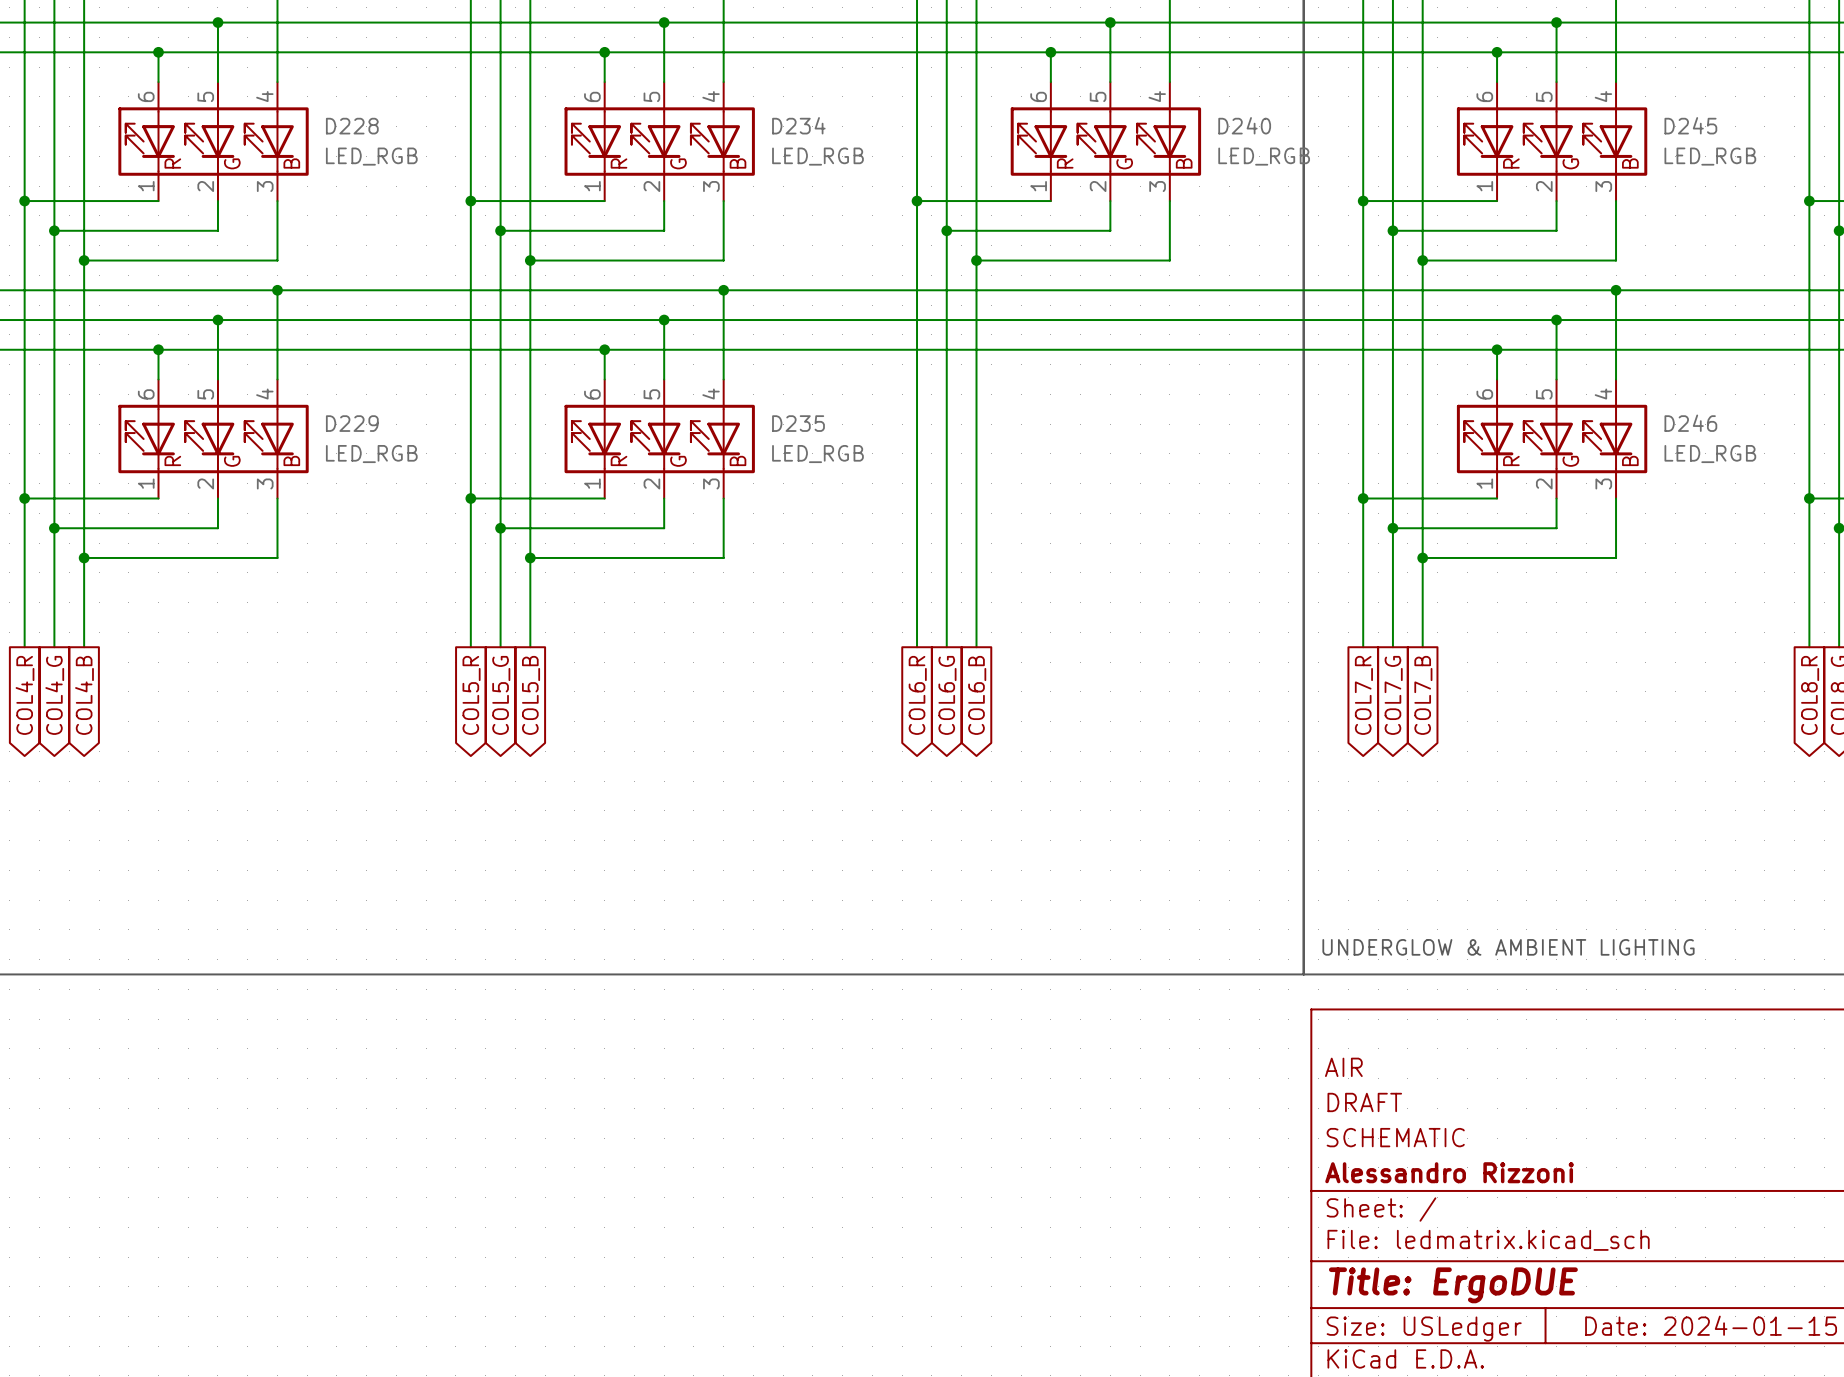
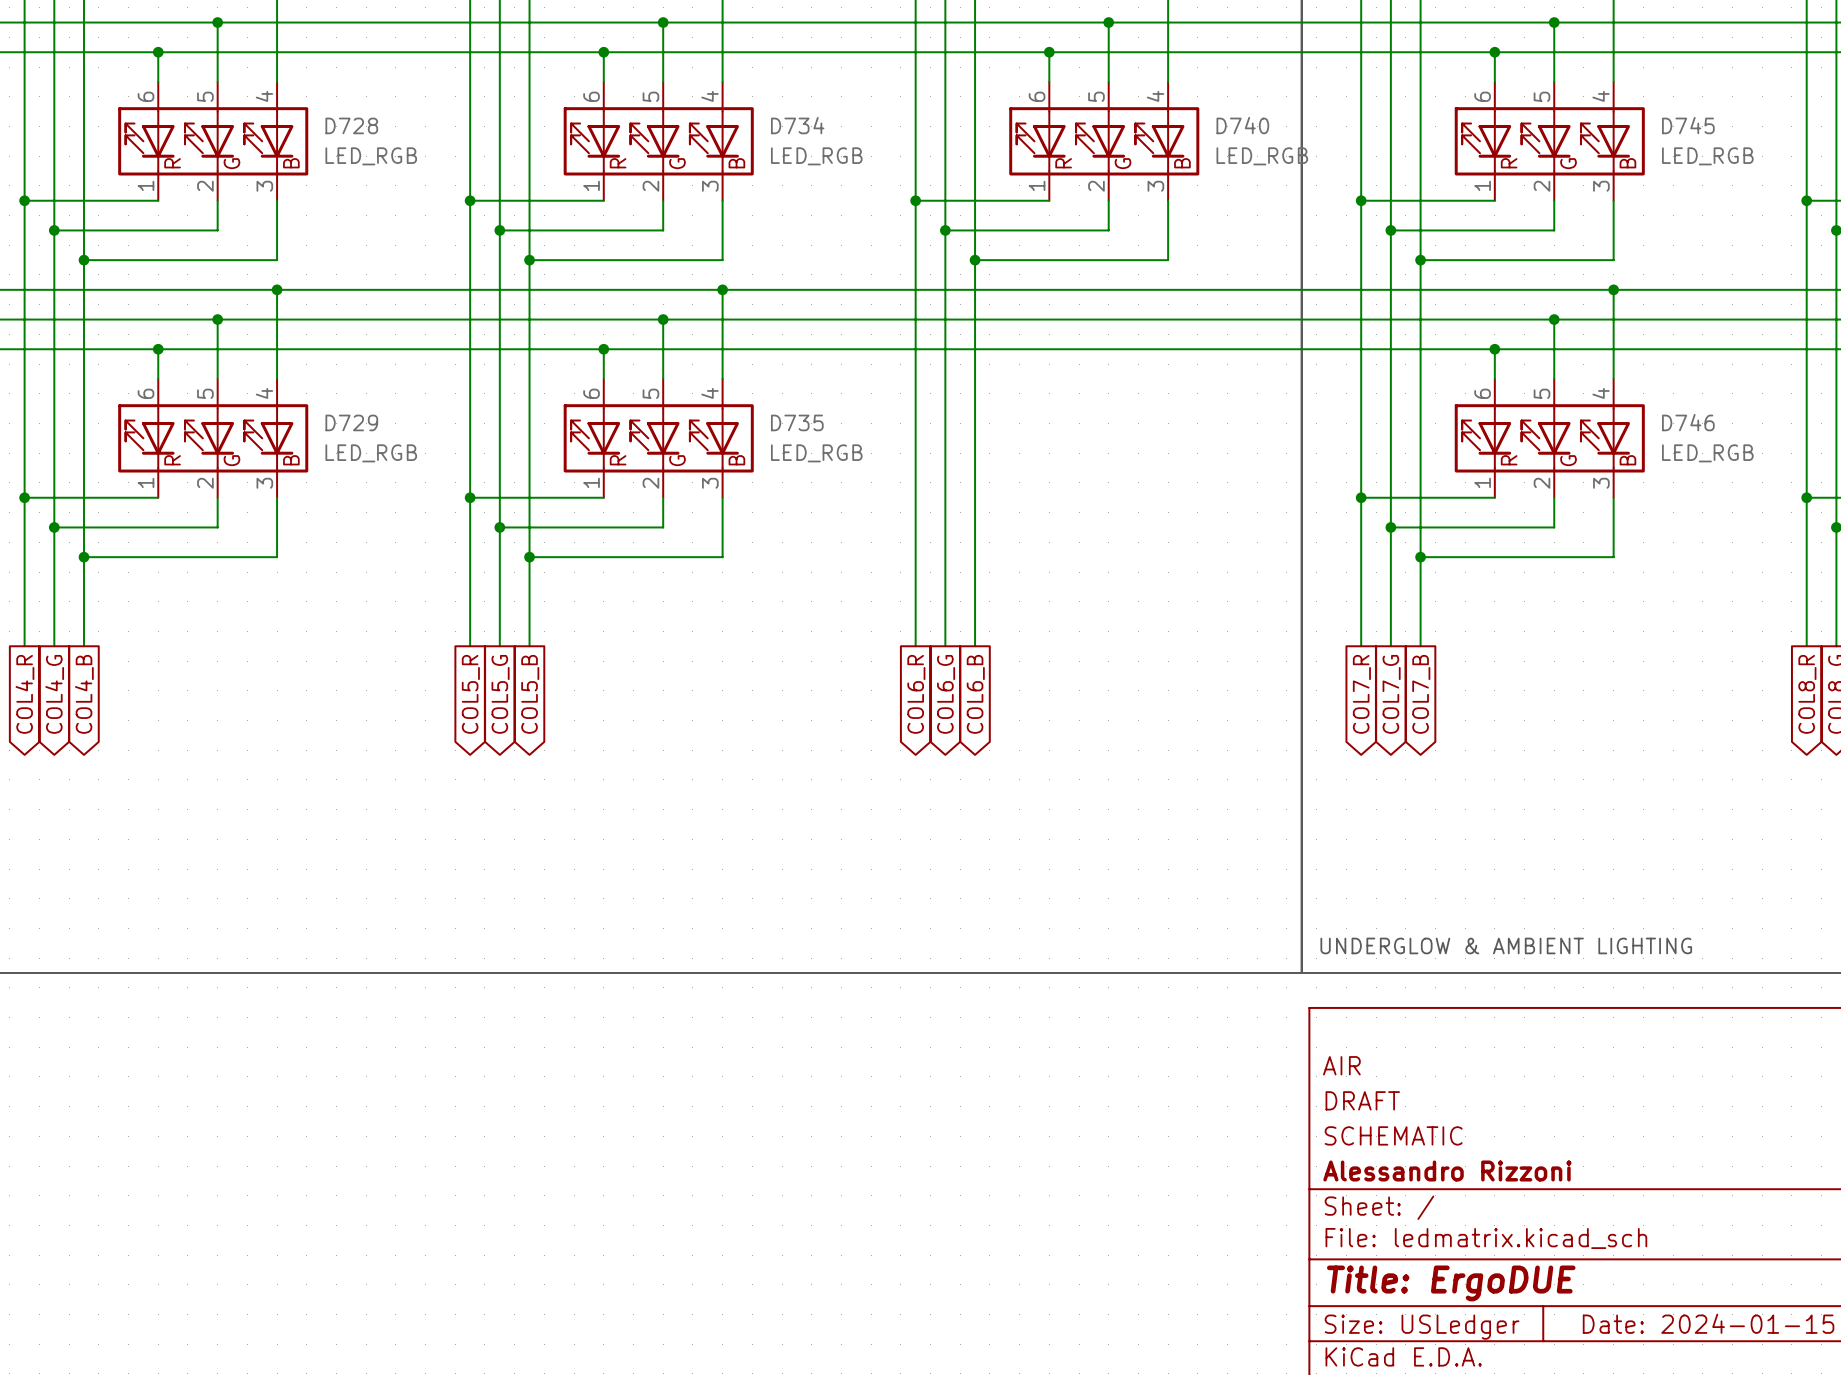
D234 name: D234 (798, 125) -> D734 (797, 125)
D240 name: D240 (1244, 125) -> D740 (1242, 125)
D245 name: D245 (1690, 125) -> D745 (1688, 125)
D228 name: D228 (352, 126) -> D728 (351, 125)
D229 name: D229 (352, 423) -> D729 (351, 422)
D235 name: D235 (798, 423) -> D735 (797, 422)
D246 name: D246 (1690, 423) -> D746 (1688, 422)

